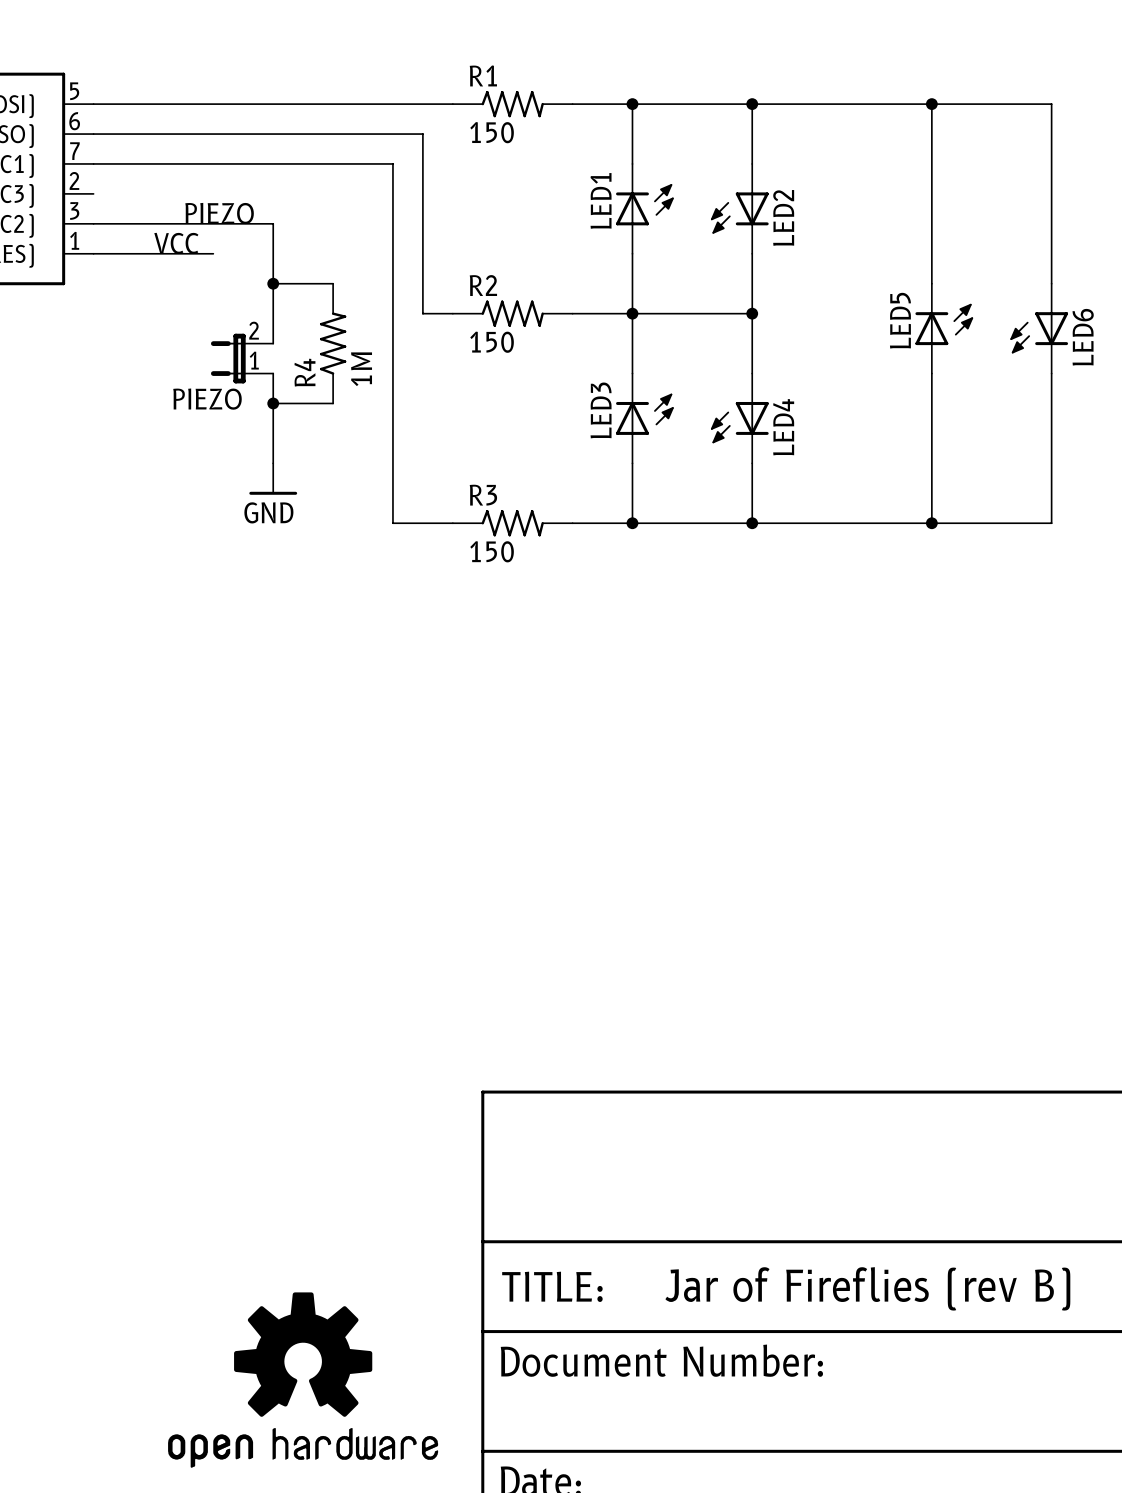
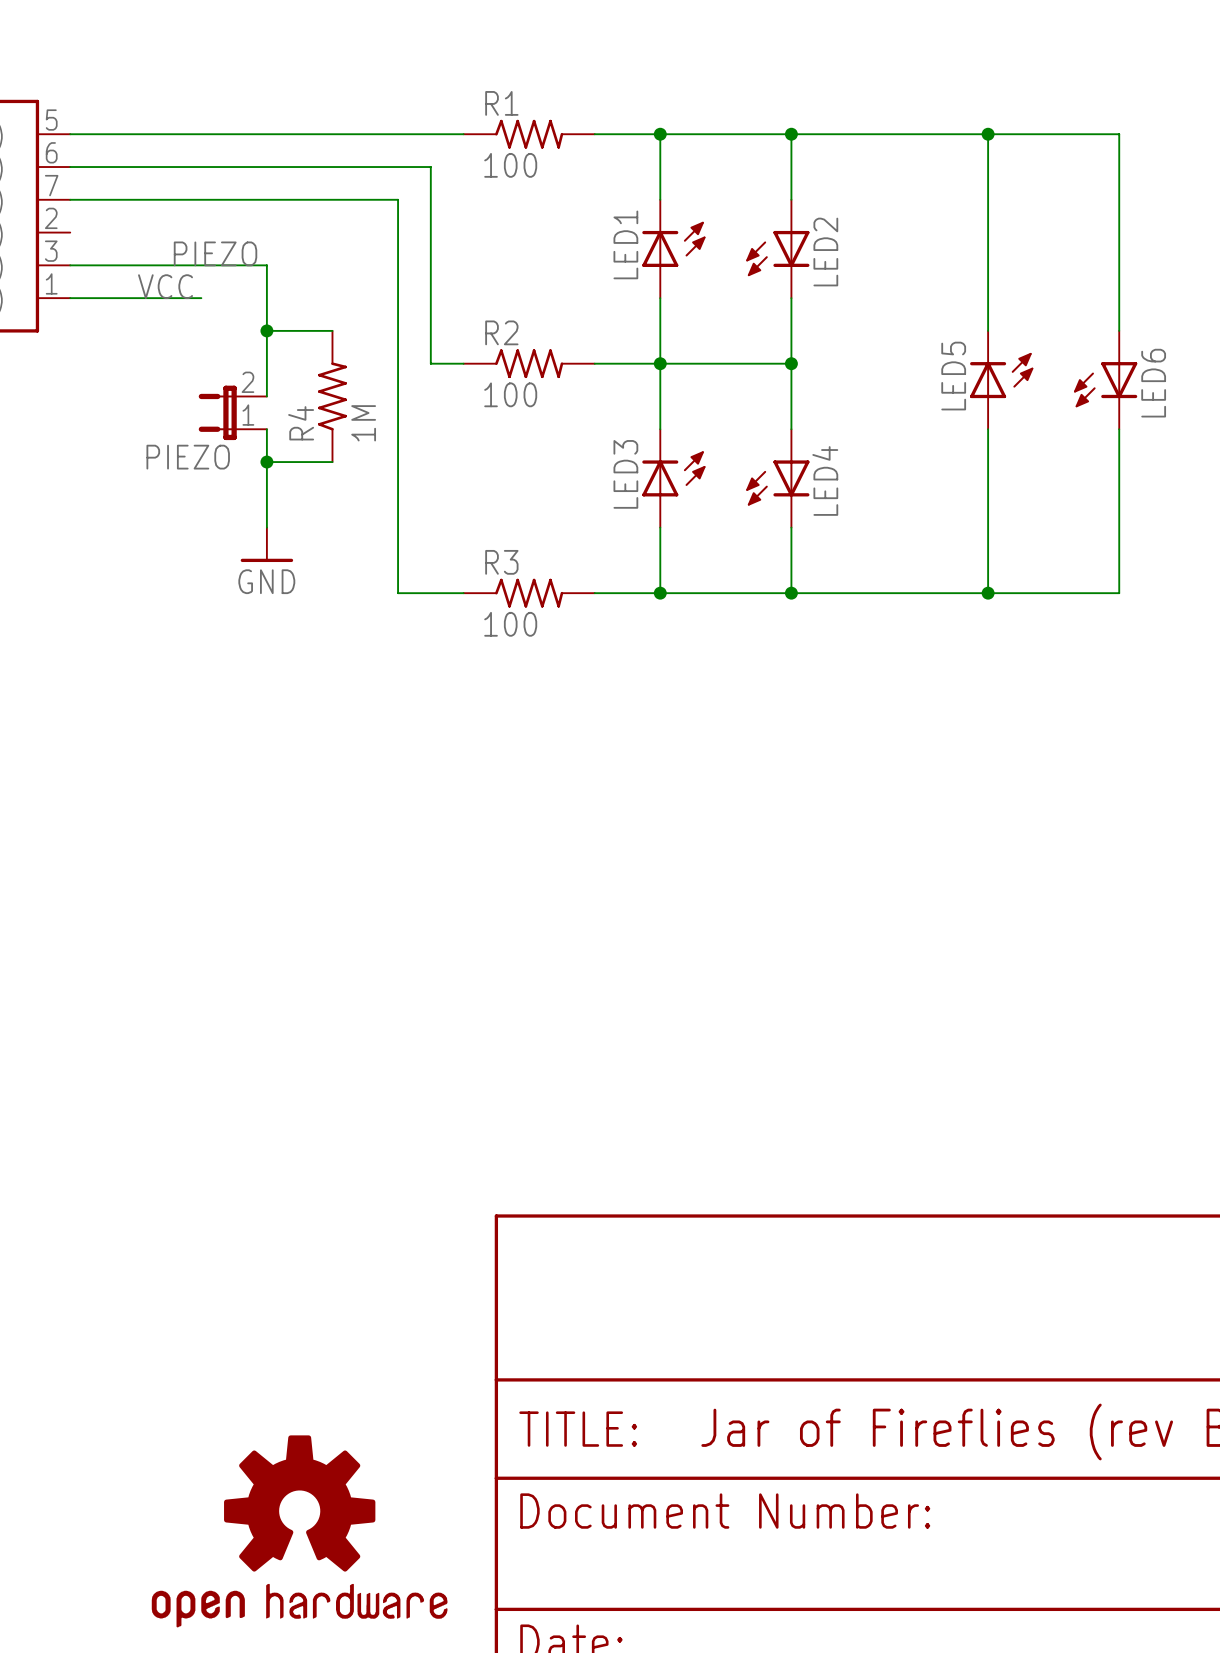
R1 value: 150 (492, 132) -> 100 (510, 165)
R2 value: 150 (492, 342) -> 100 (510, 394)
R3 value: 150 (492, 551) -> 100 (510, 624)

